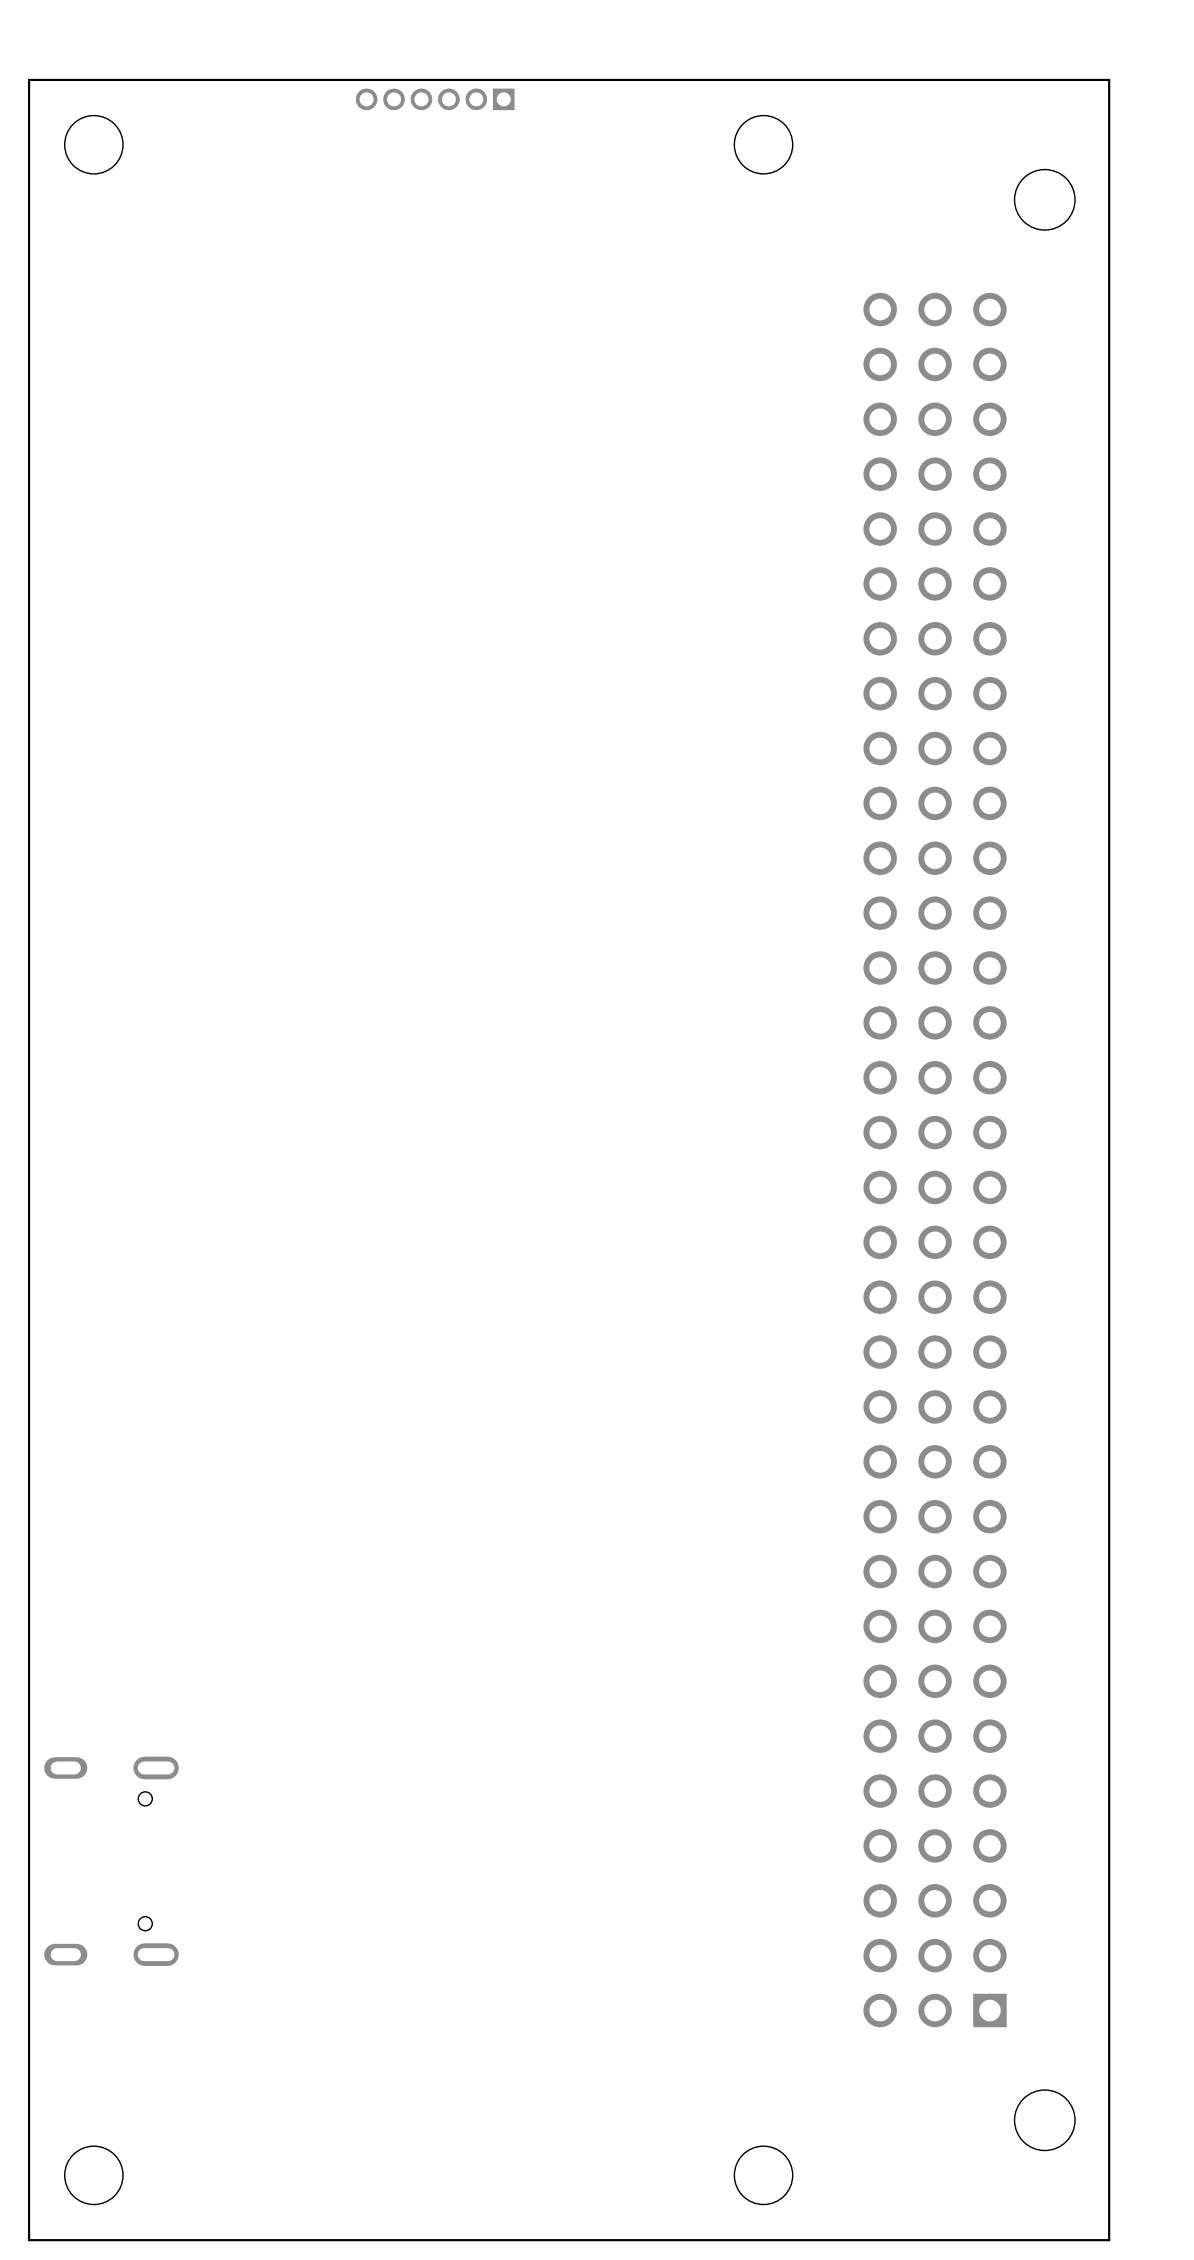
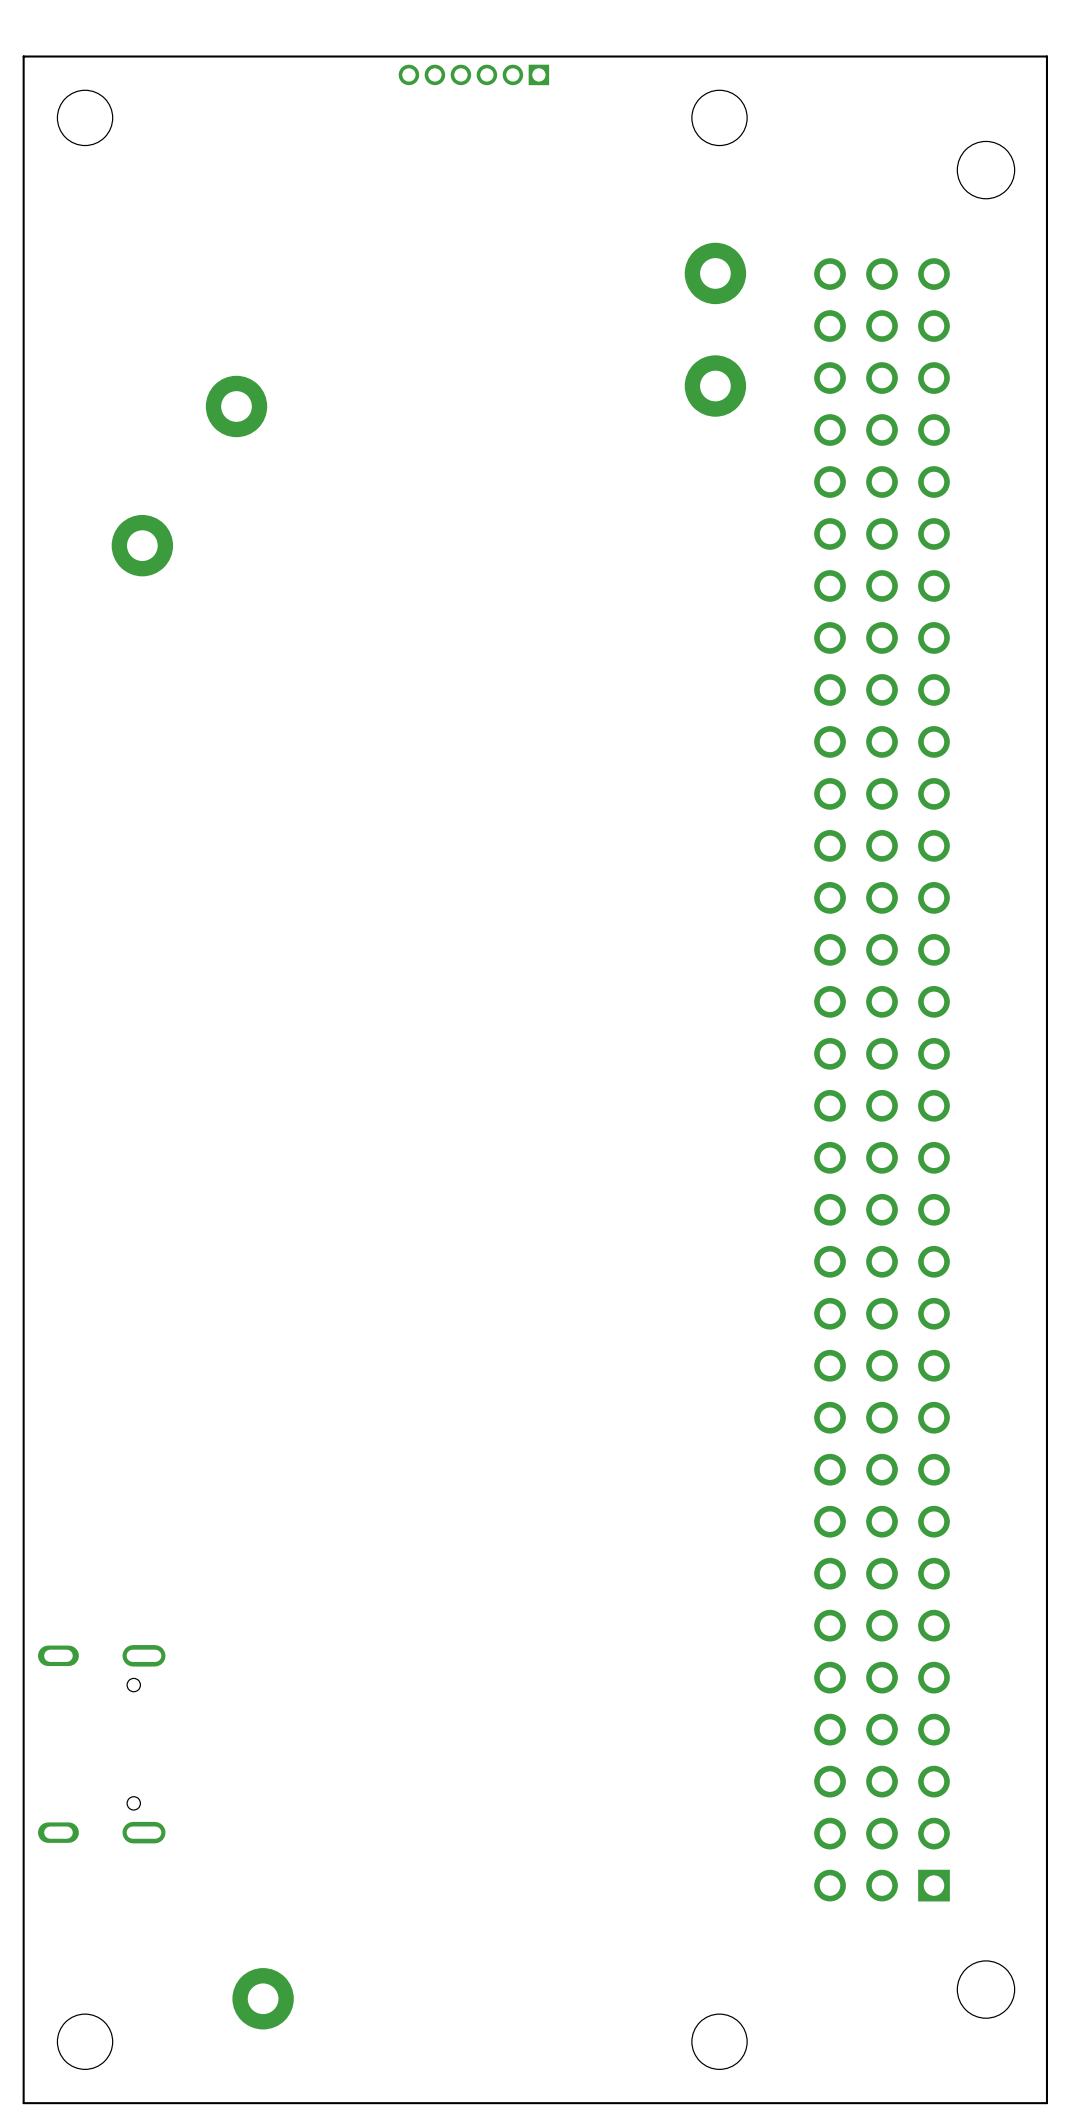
part position: (435, 99) -> (473, 74)
part: none -> (715, 273)
part: none -> (715, 386)
part: none -> (236, 406)
part: none -> (142, 545)
part: none -> (263, 1998)

